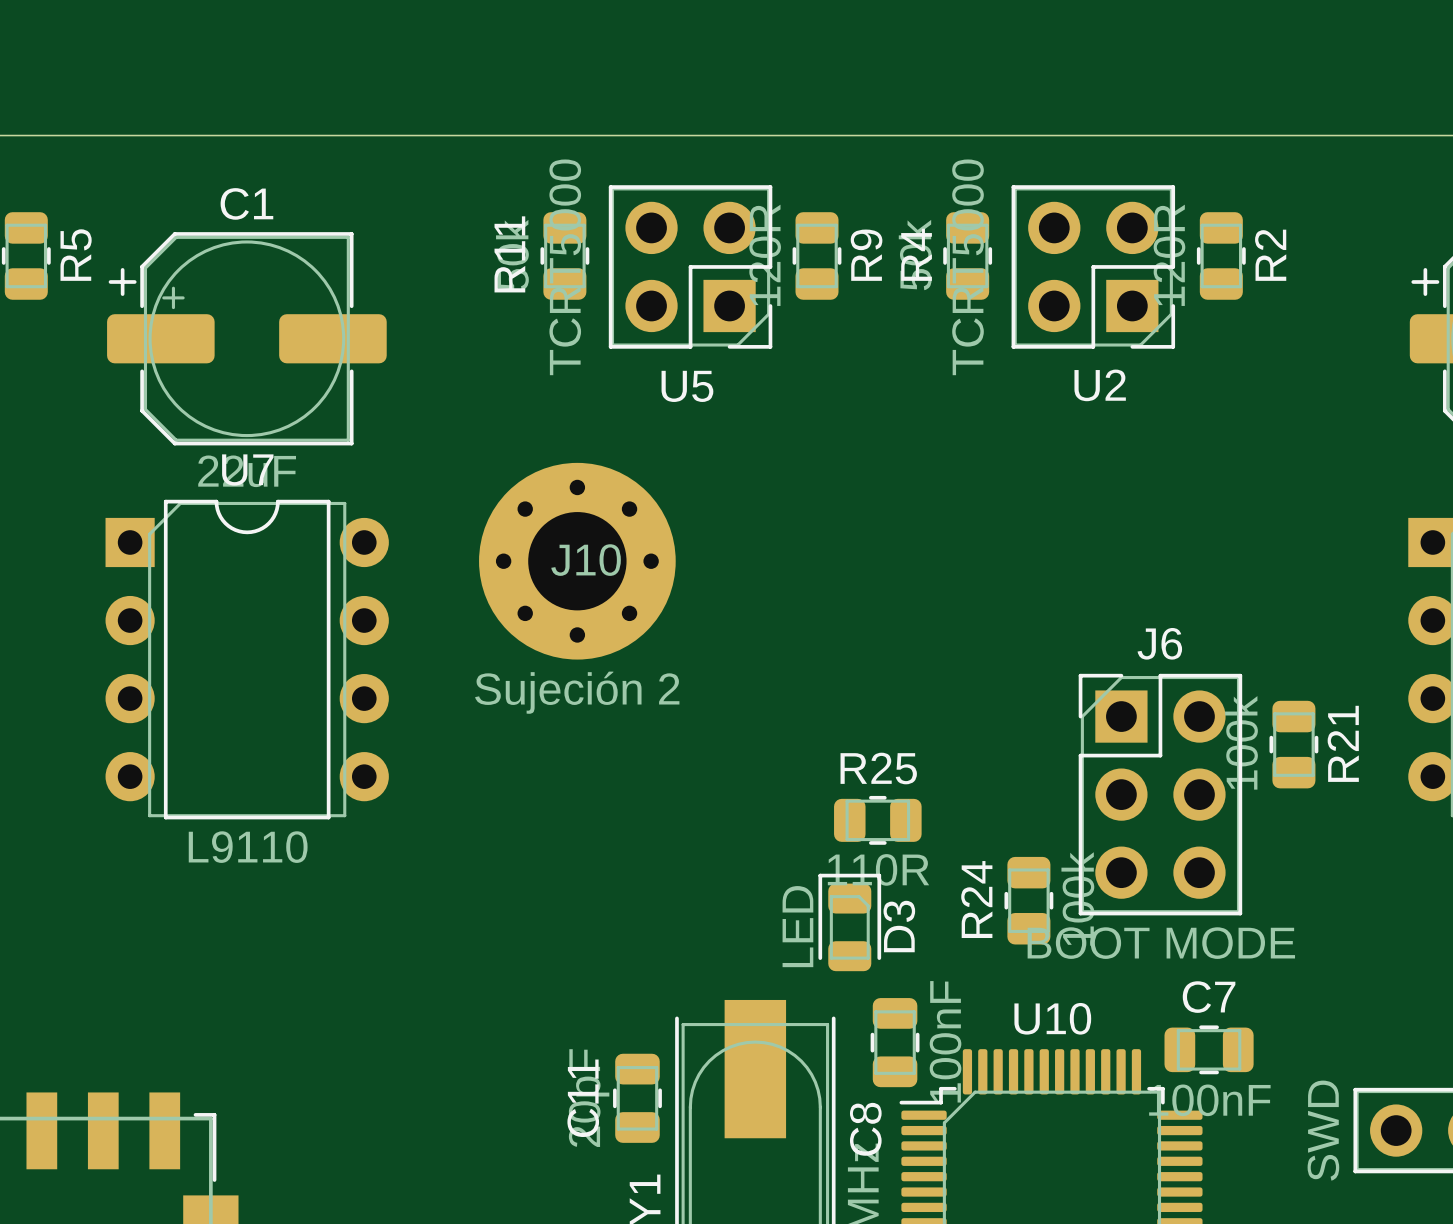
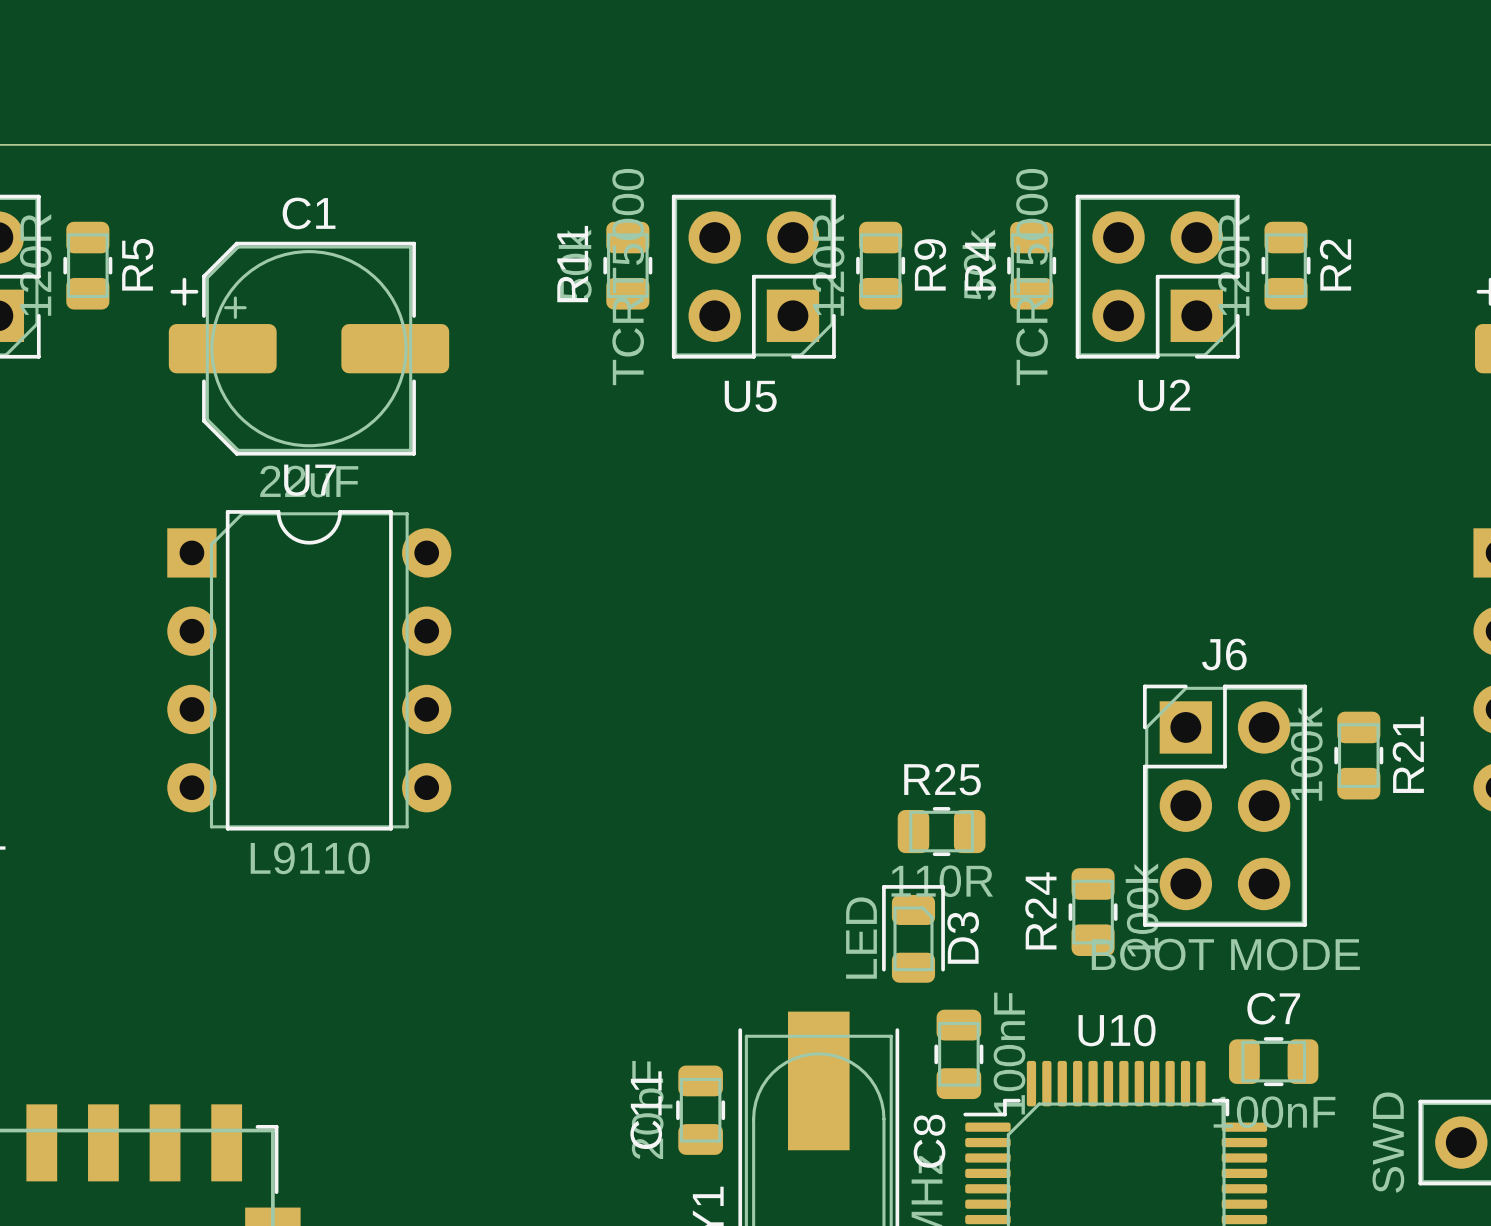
J10: Sujeción 2 (577, 561) -> none

